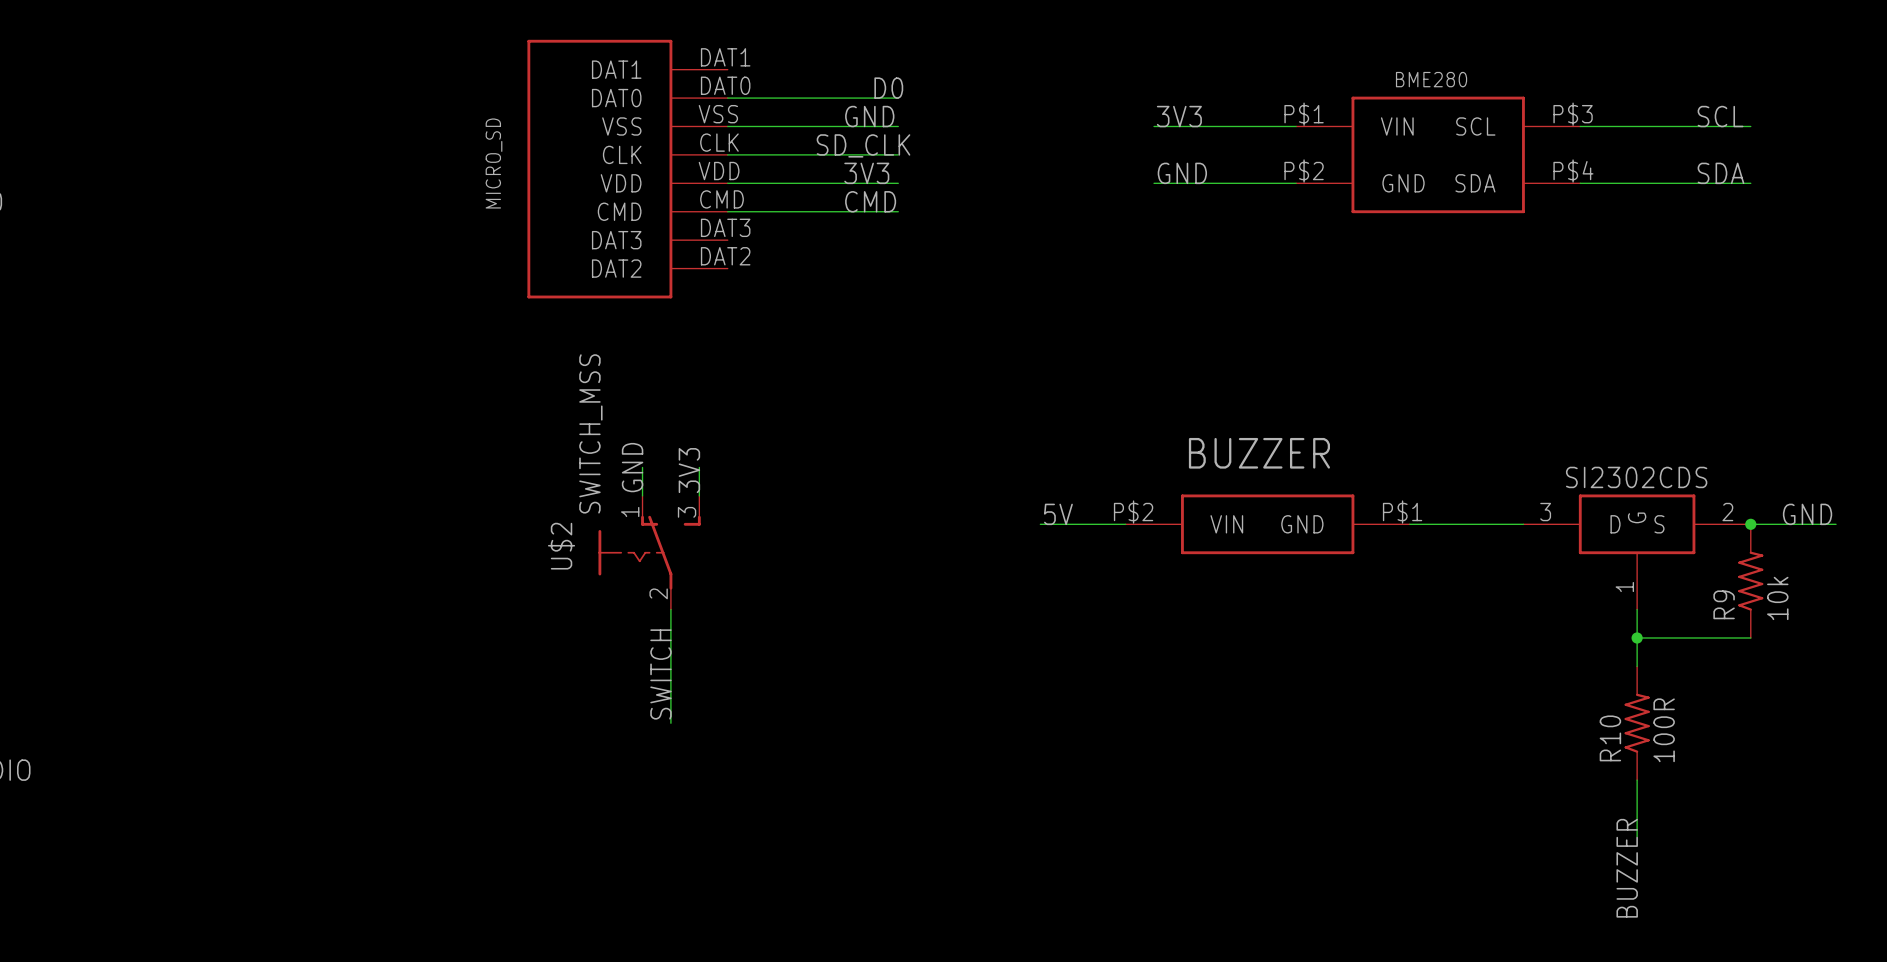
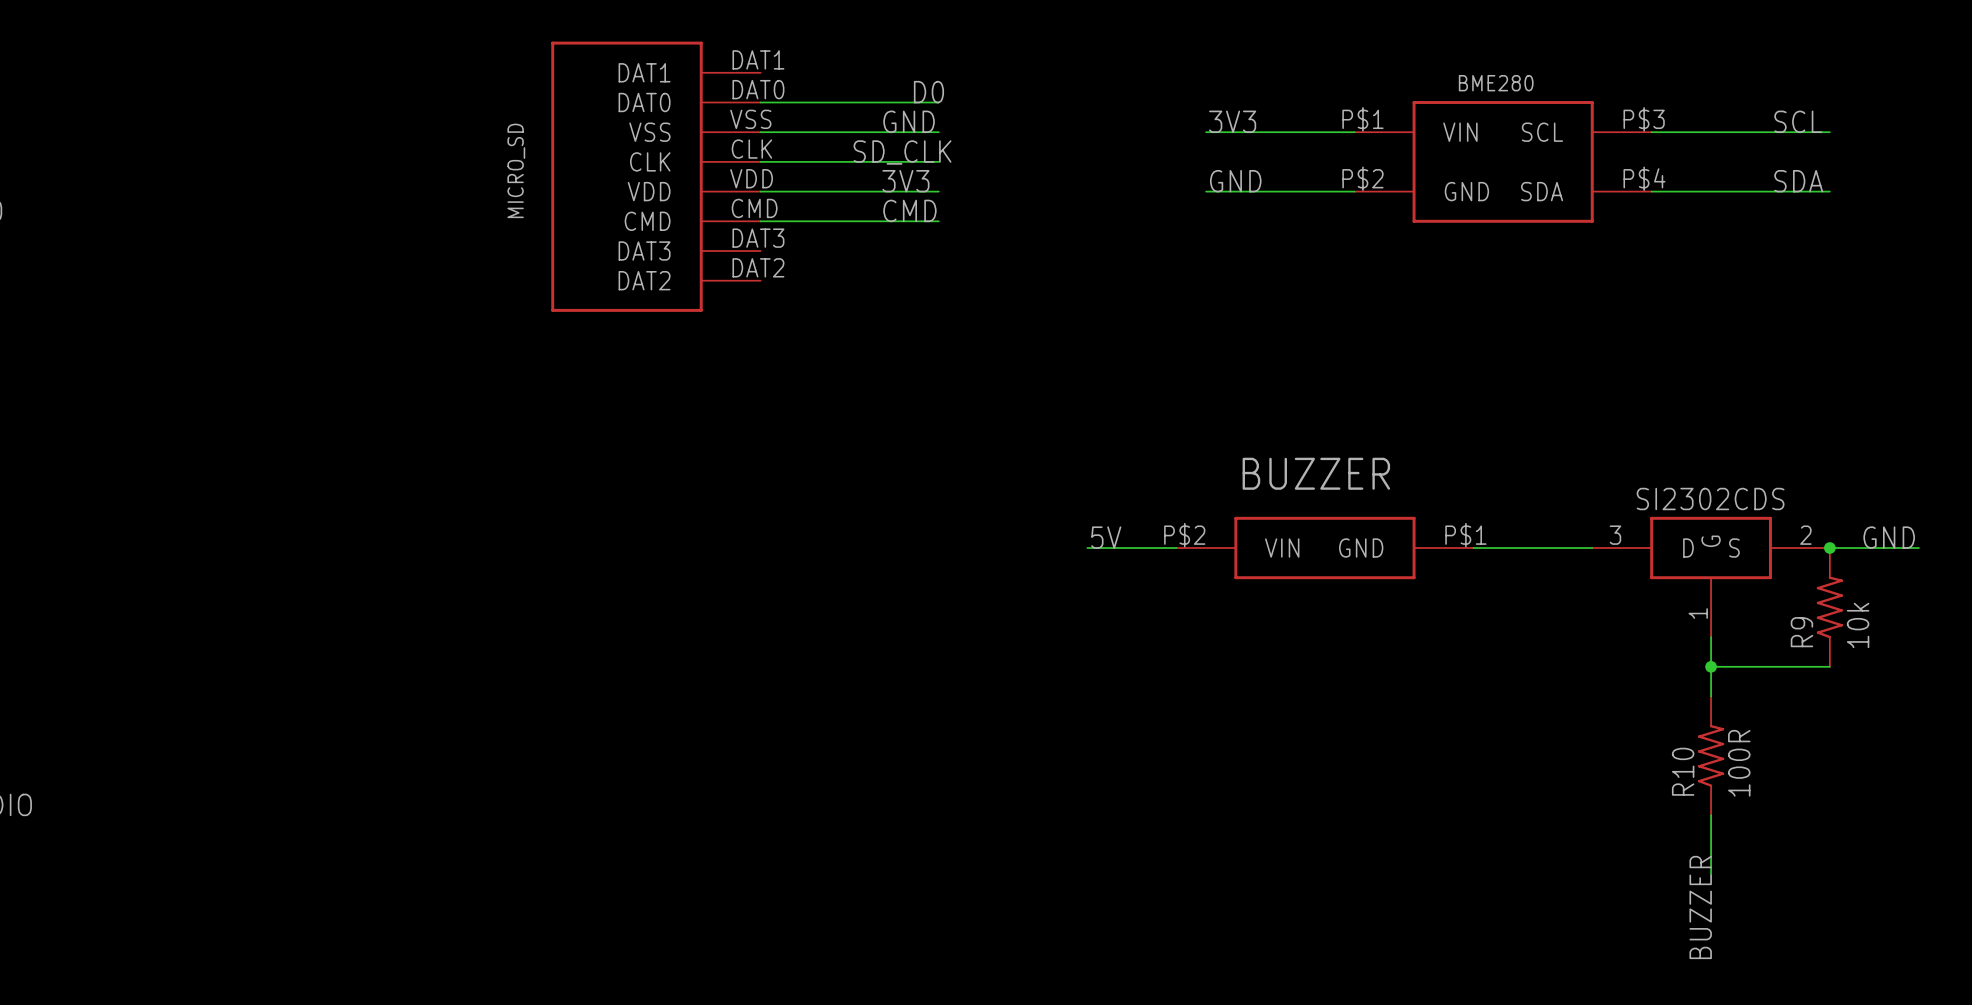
label: GND (632, 467) -> none
wire: (642, 467) (642, 495) -> none
wire: (699, 467) (699, 495) -> none
label: 3V3 (689, 470) -> none
U$2: SWITCH_MSS (649, 552) -> none
wire: (670, 609) (670, 723) -> none
label: SWITCH (660, 674) -> none

